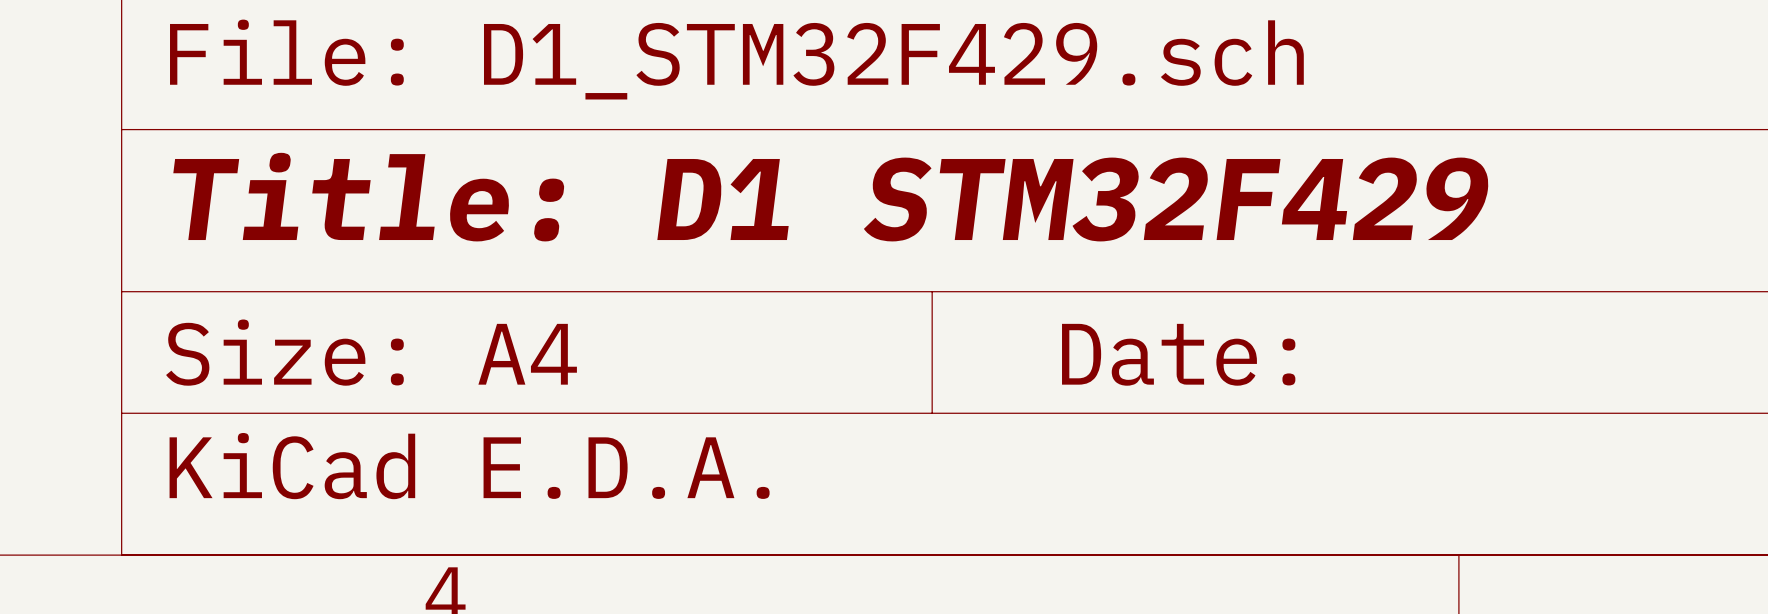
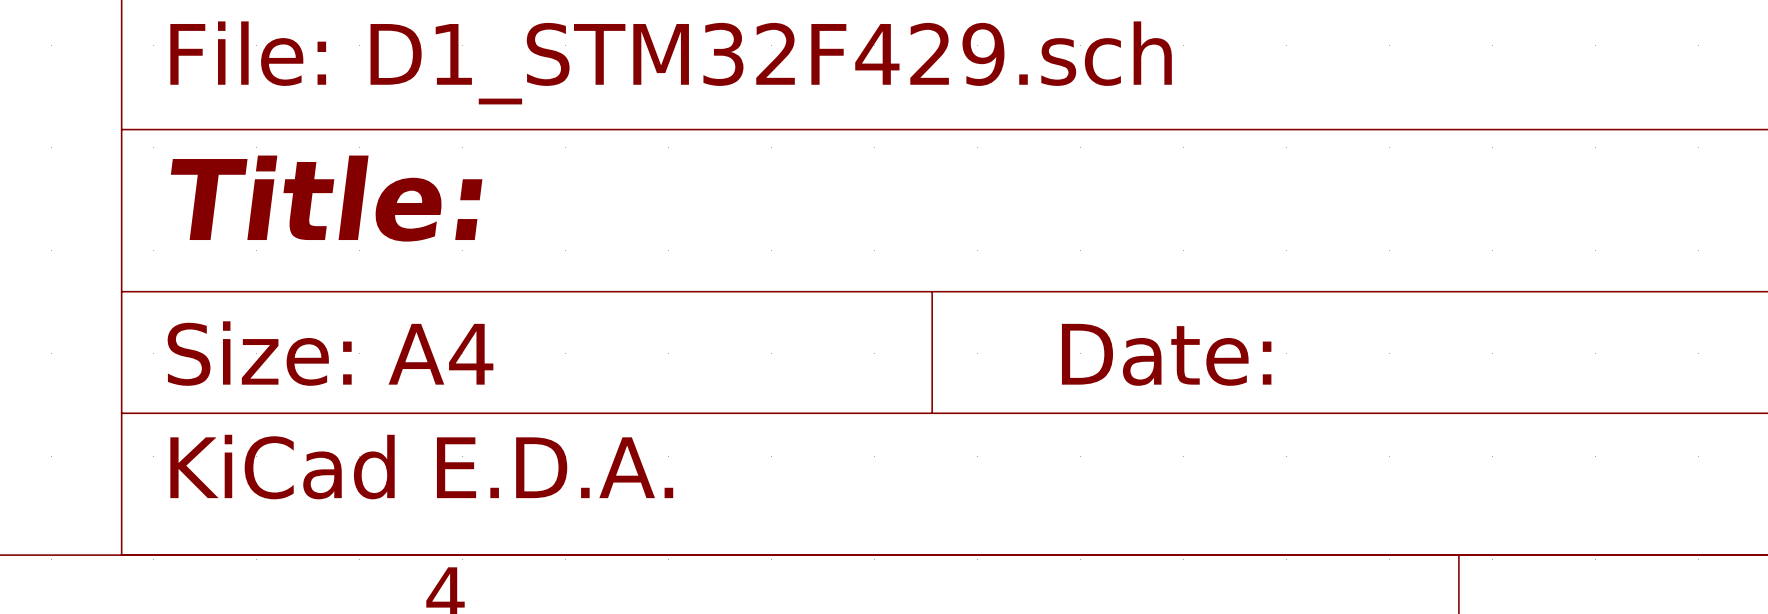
title block: Title: D1 STM32F429 (831, 197) -> Title: (326, 198)

